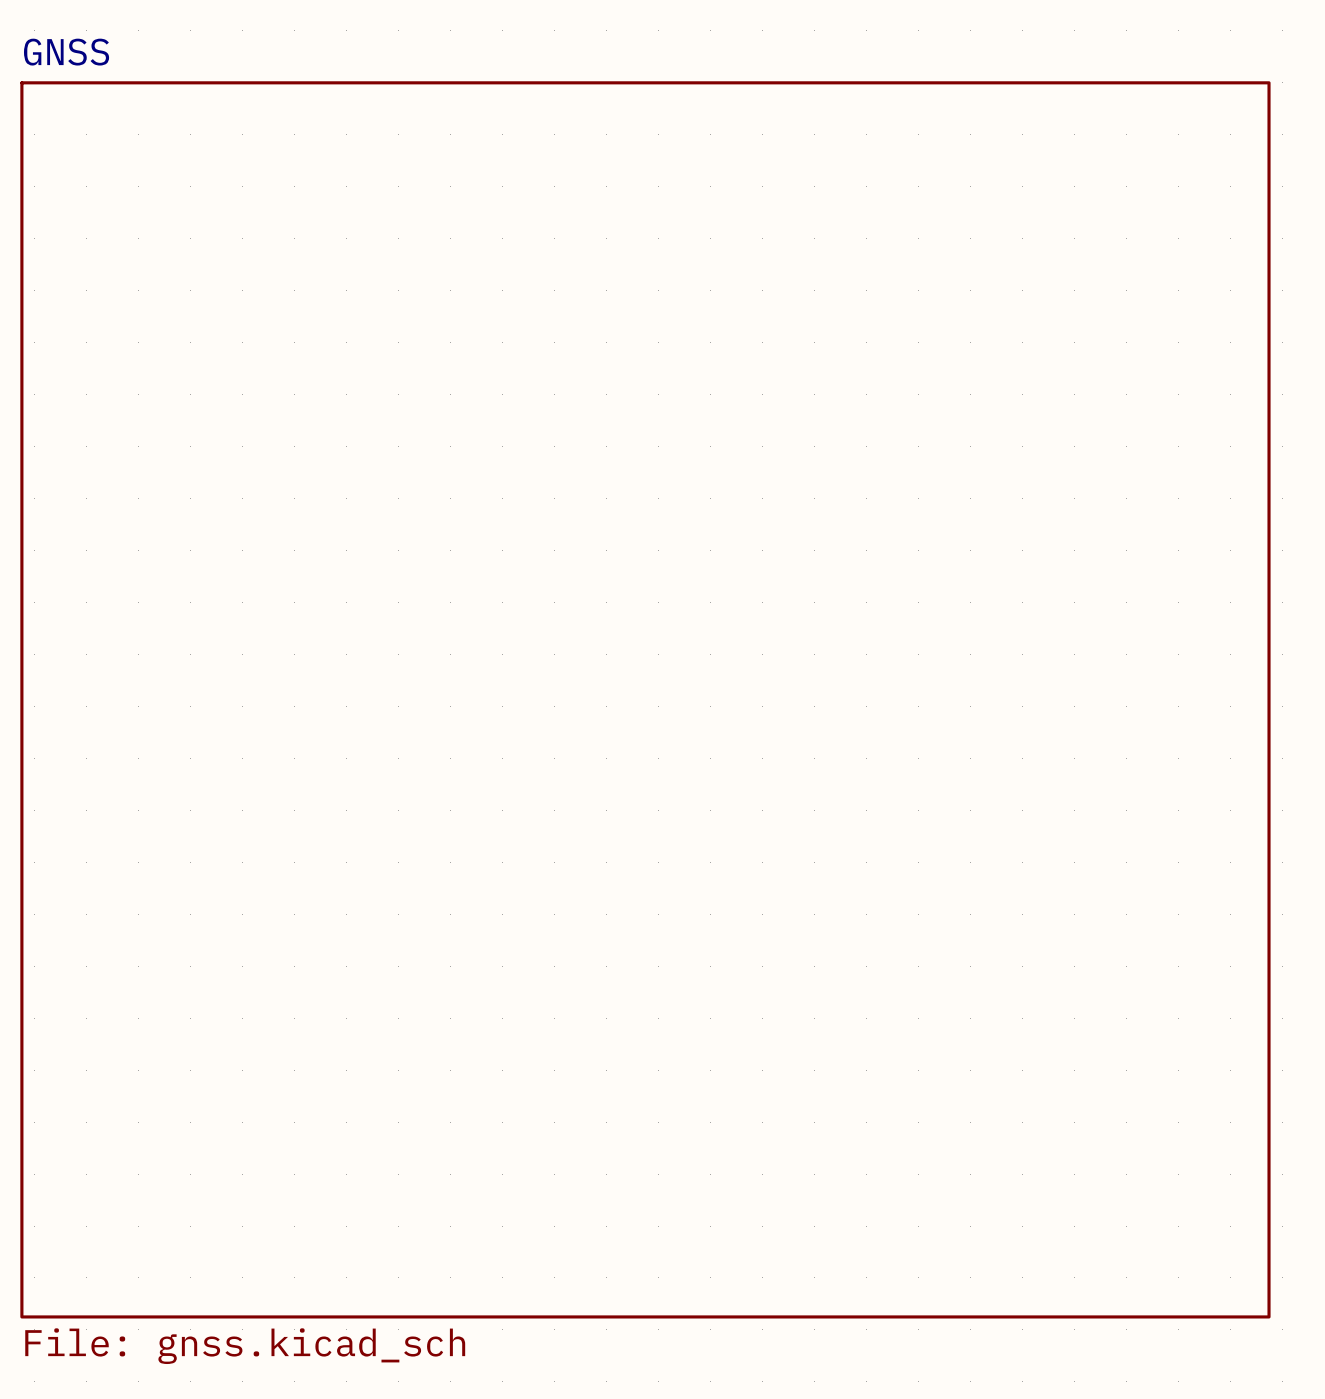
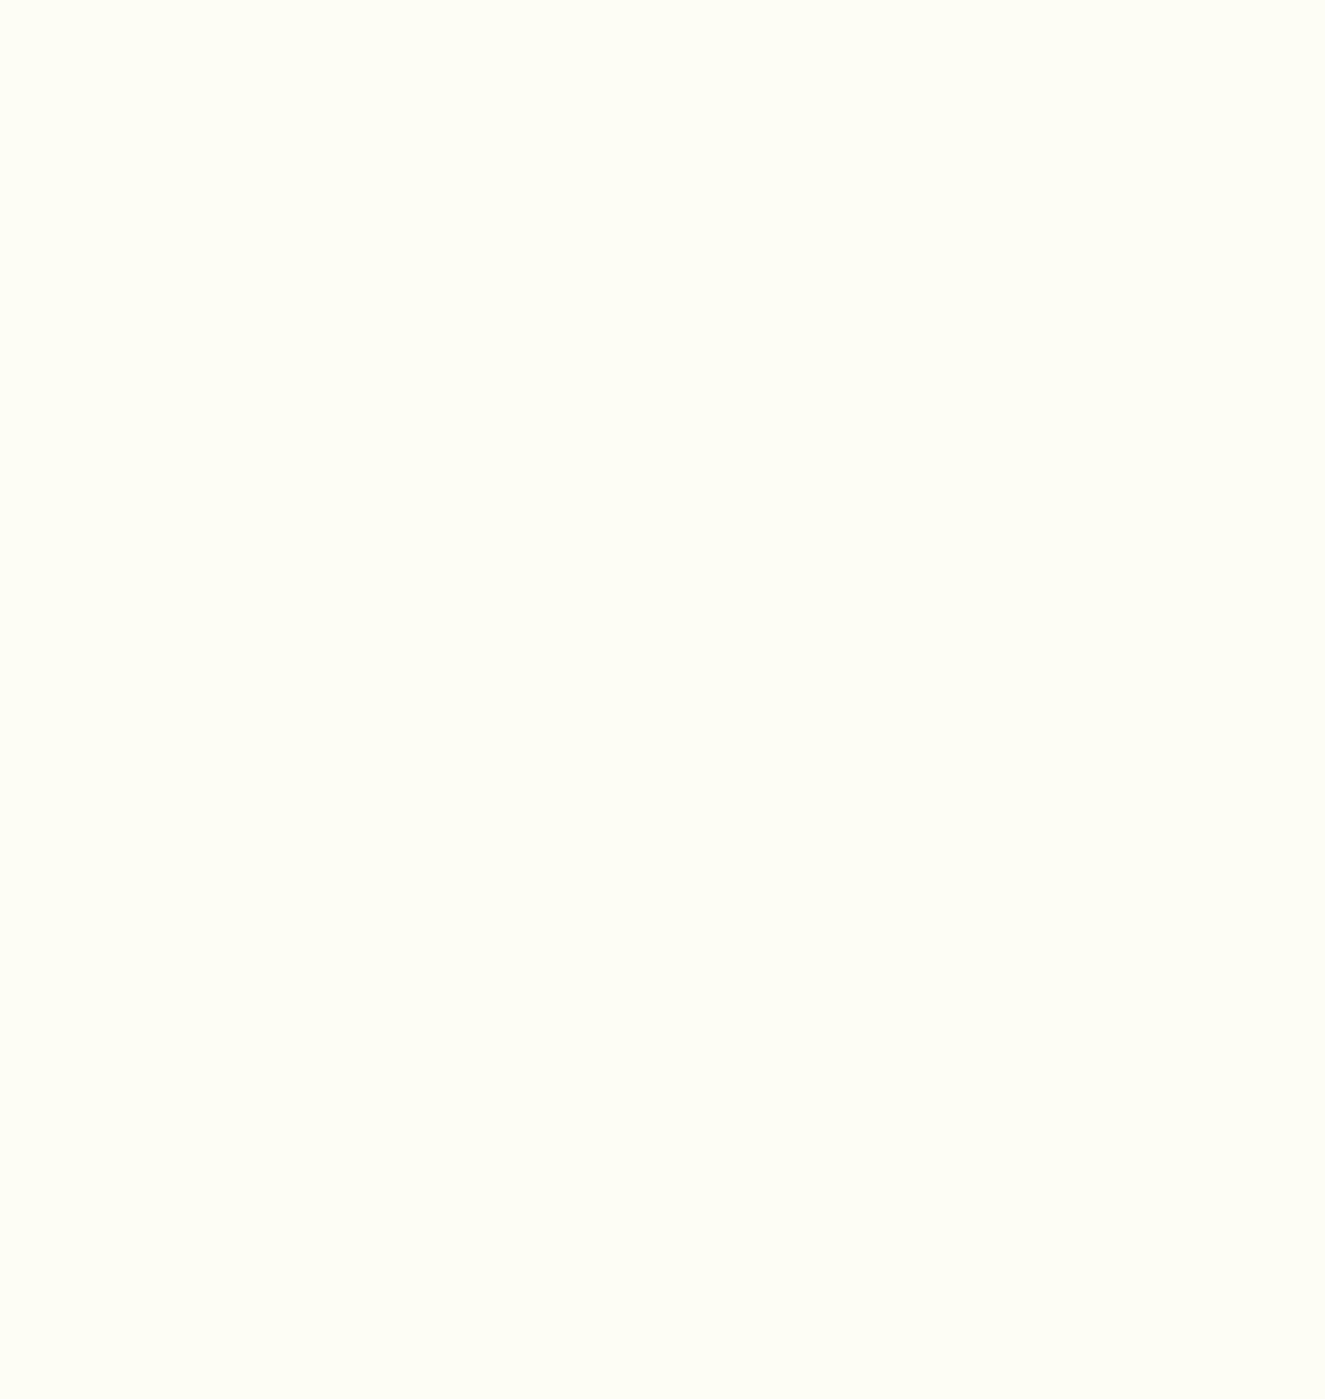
sheet GNSS: File: gnss.kicad_sch (645, 699) -> none

